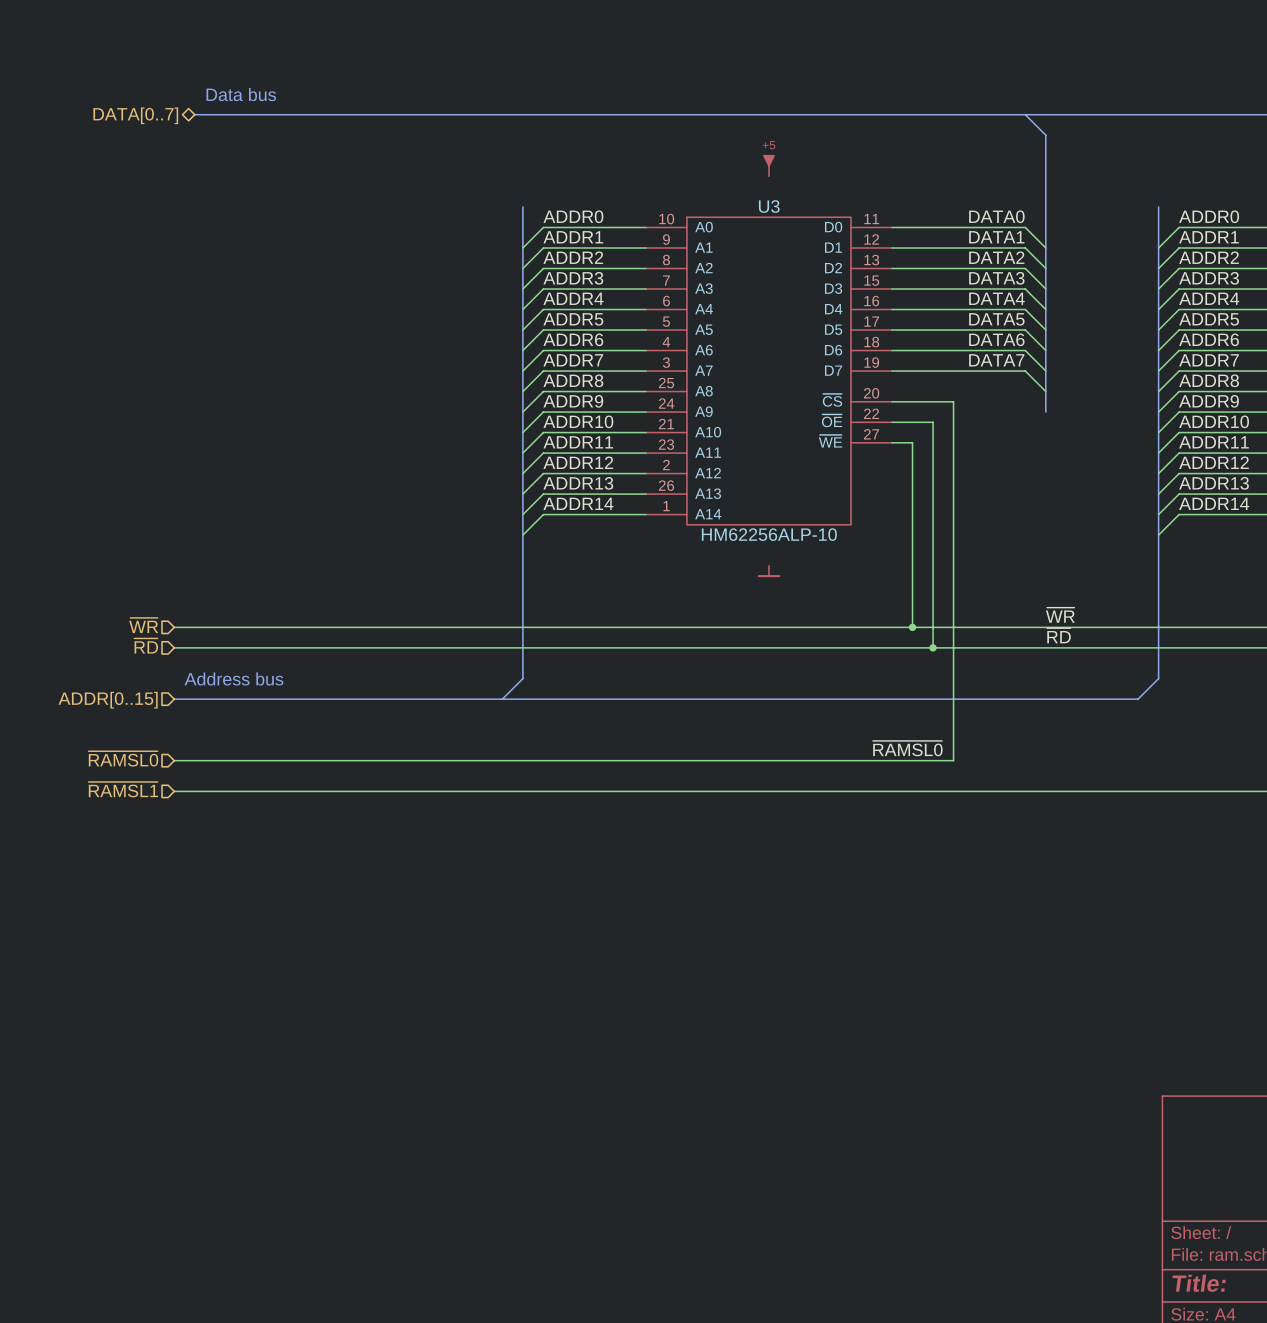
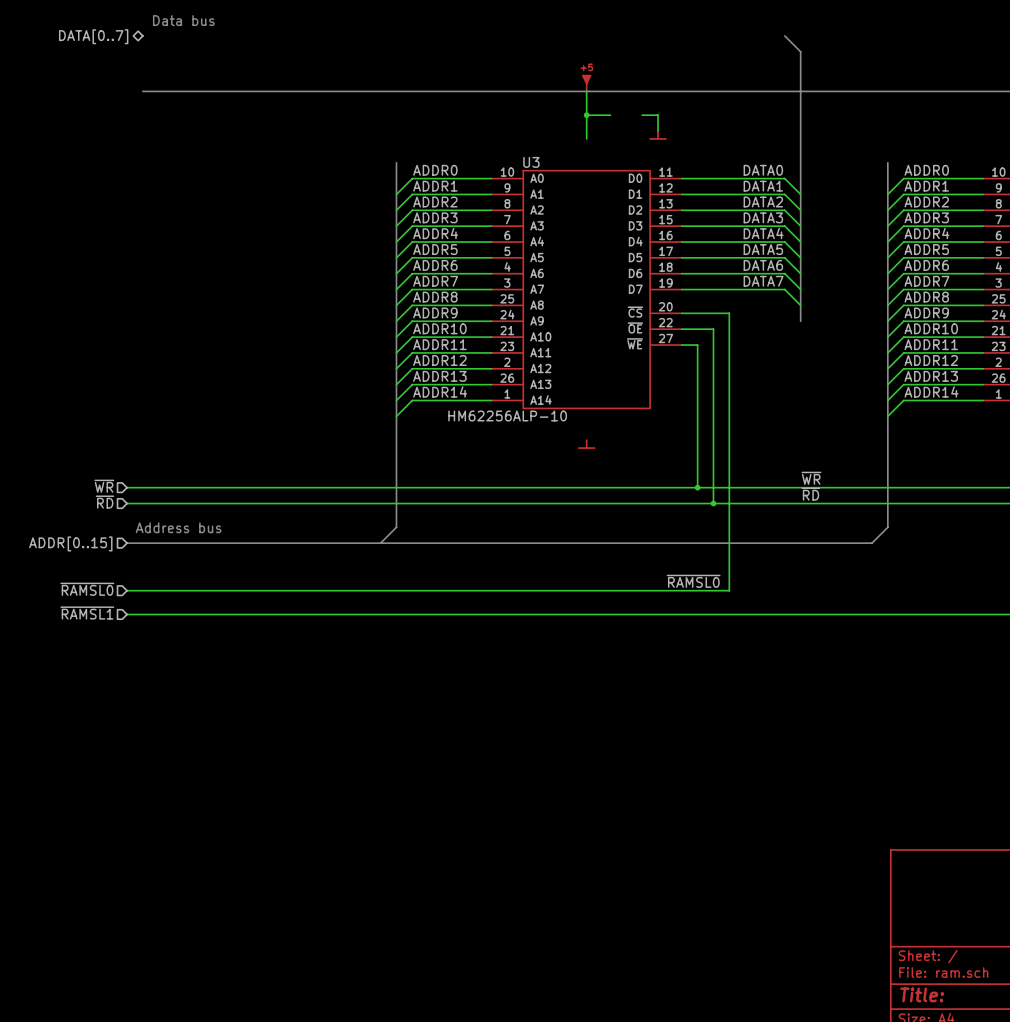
text position: Data bus (241, 94) -> Data bus (183, 20)
wire: none -> (586, 91) (586, 138)
bus: (1025, 114) (1045, 135) -> (784, 35) (800, 51) (800, 107)
hierarchical label position: DATA[0..7] (135, 115) -> DATA[0..7] (93, 36)
wire: none -> (586, 115) (610, 115)
junction: none -> (586, 115)
wire: none -> (642, 115) (658, 115) (658, 131)
power symbol position: (768, 165) -> (586, 83)
power symbol: none -> (658, 135)
U3 name position: U3 (769, 206) -> U3 (531, 162)
U3 value position: HM62256ALP-10 (769, 534) -> HM62256ALP-10 (507, 416)

